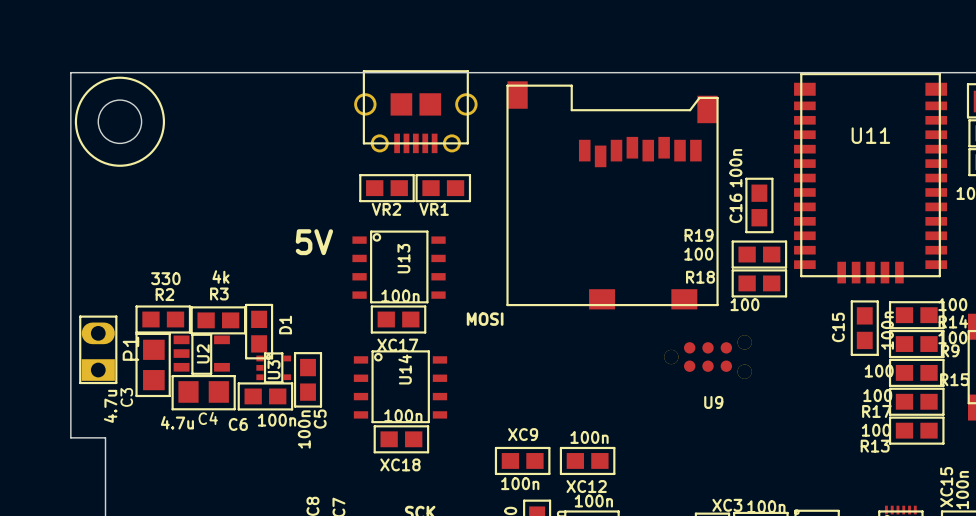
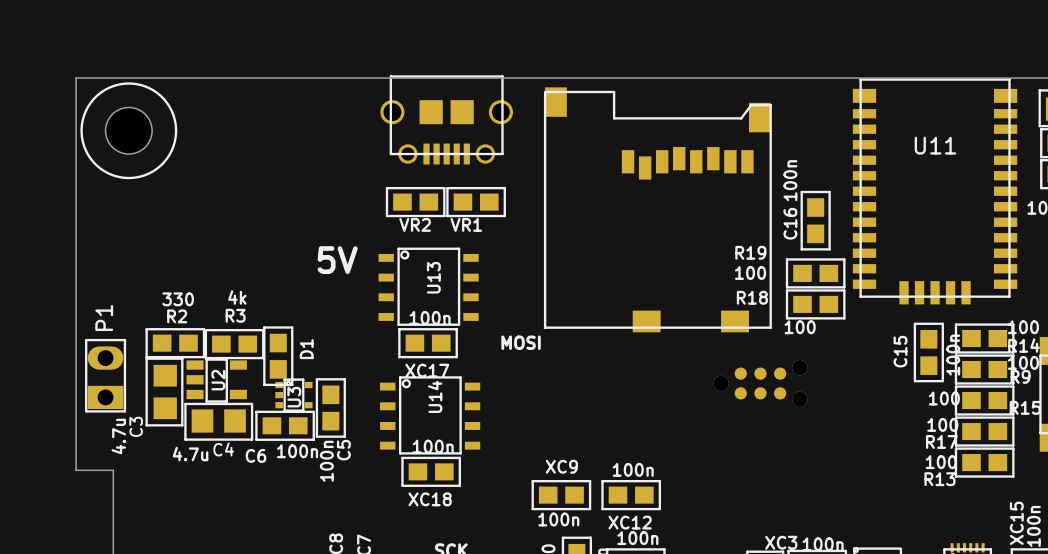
P1 name position: P1 (130, 348) -> P1 (104, 317)
U9 name: U9 (713, 402) -> none

